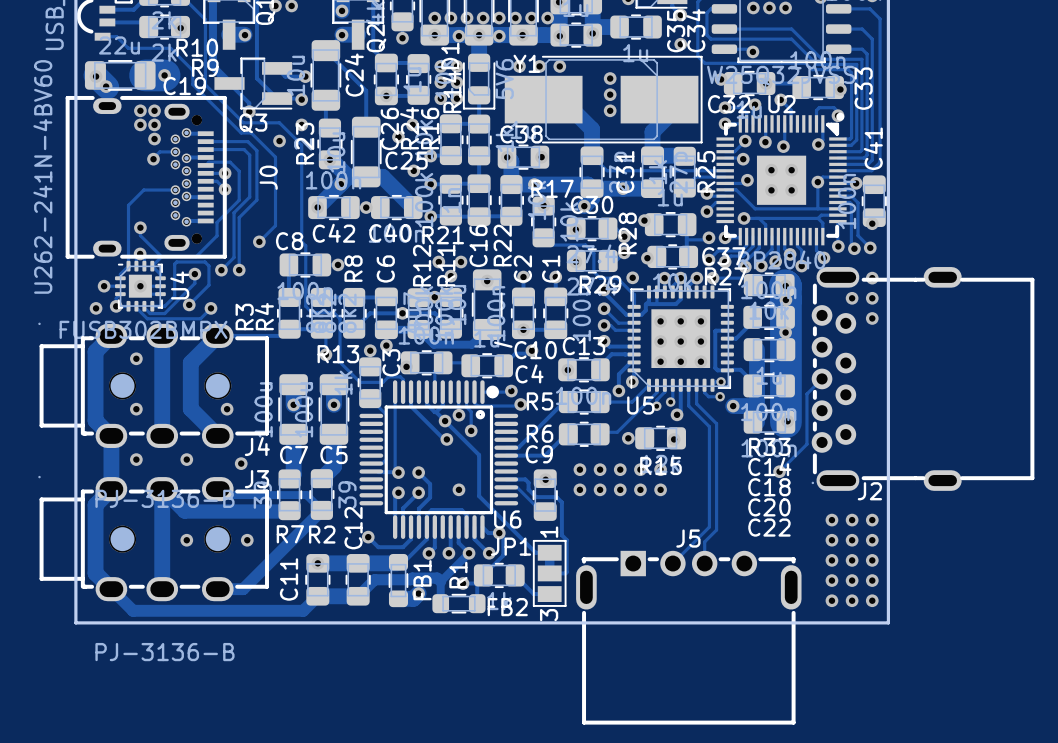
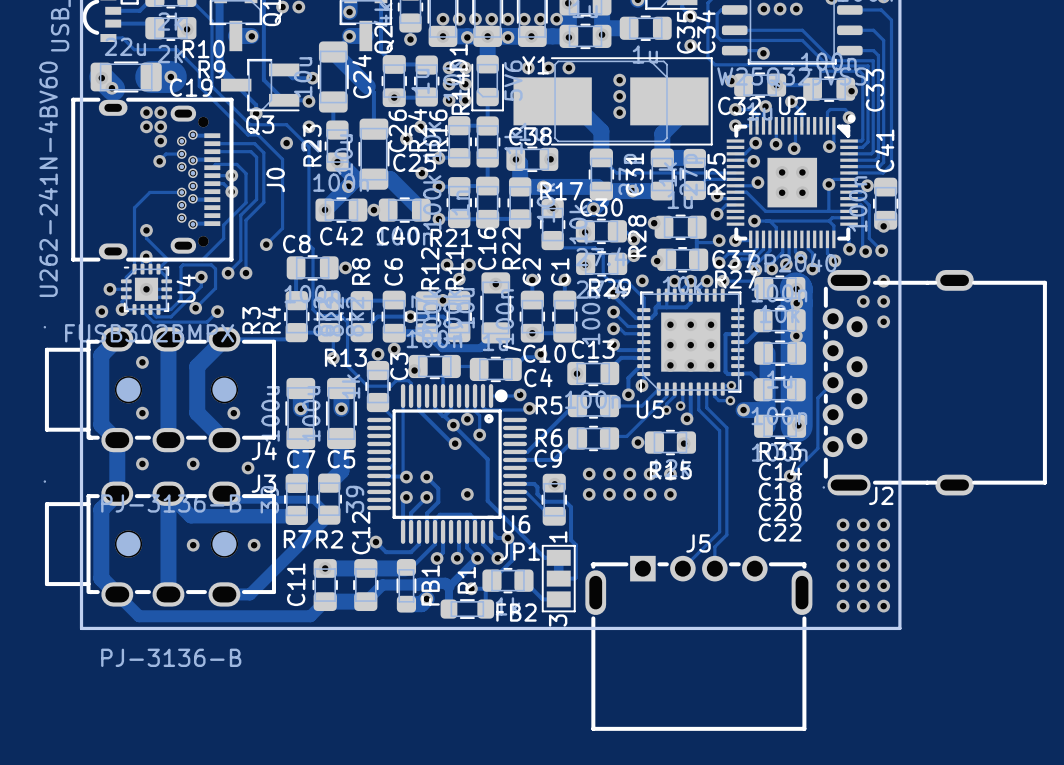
track width: thin (325, 50) (360, 84) -> thick (333, 52) (367, 86)

